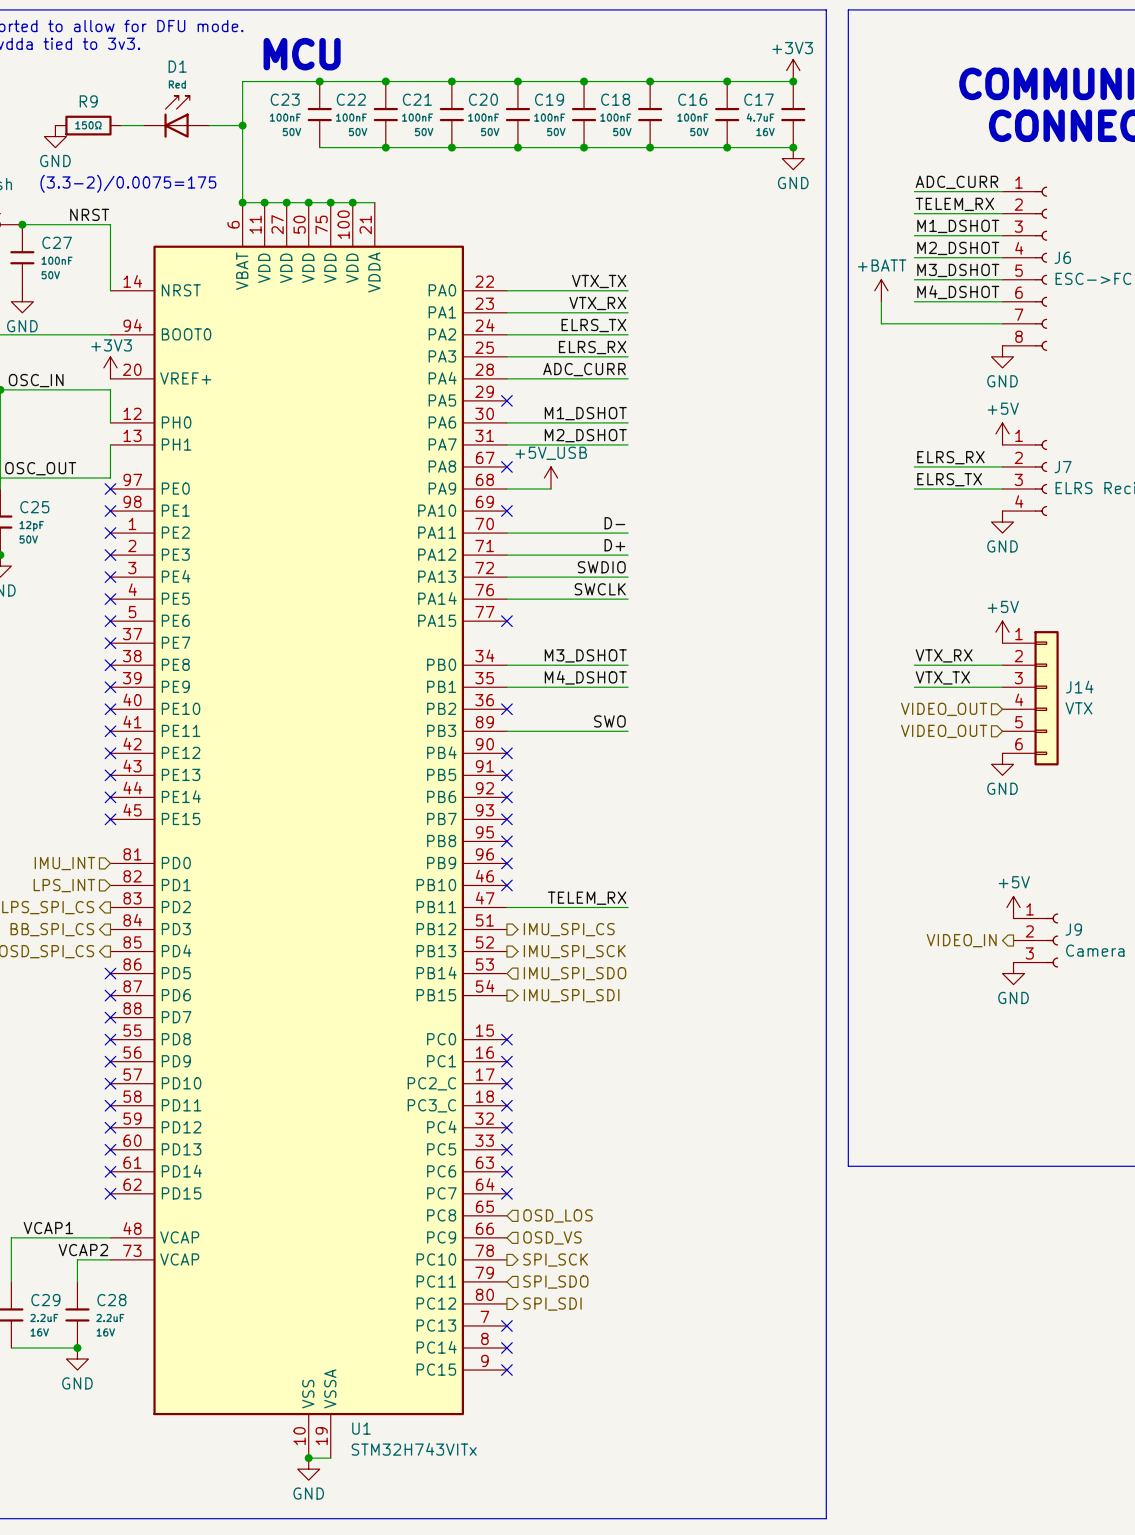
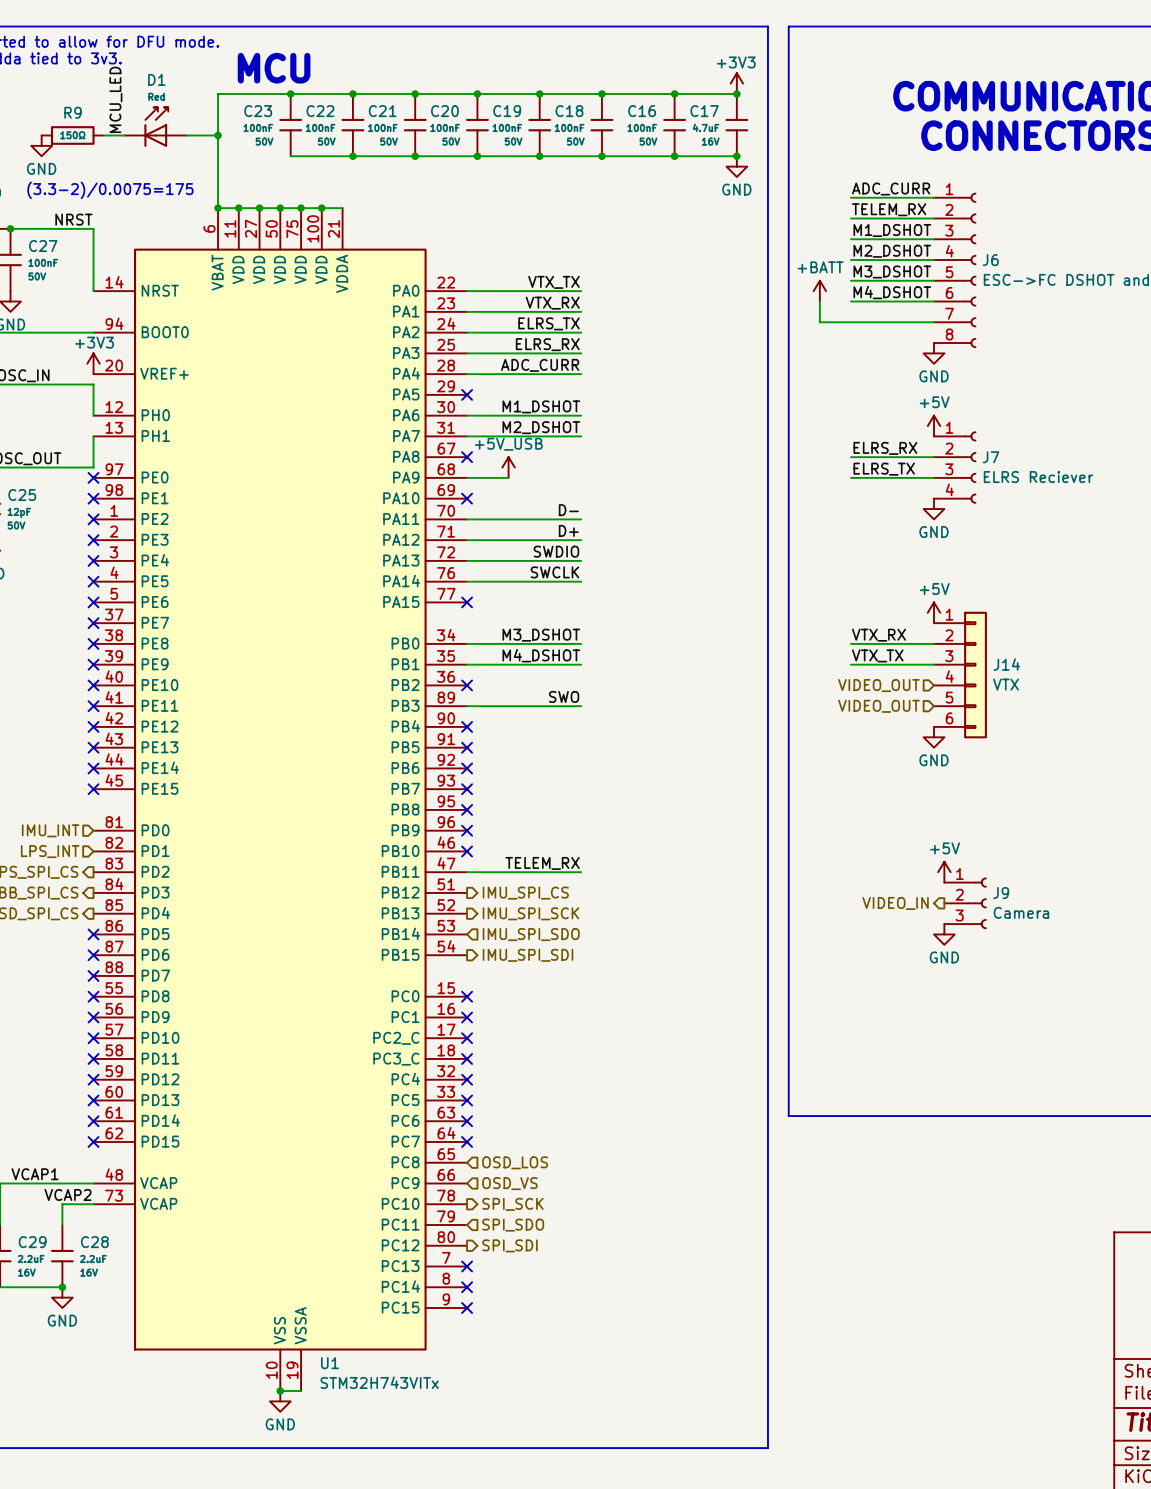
label: none -> MCU_LED (115, 99)

